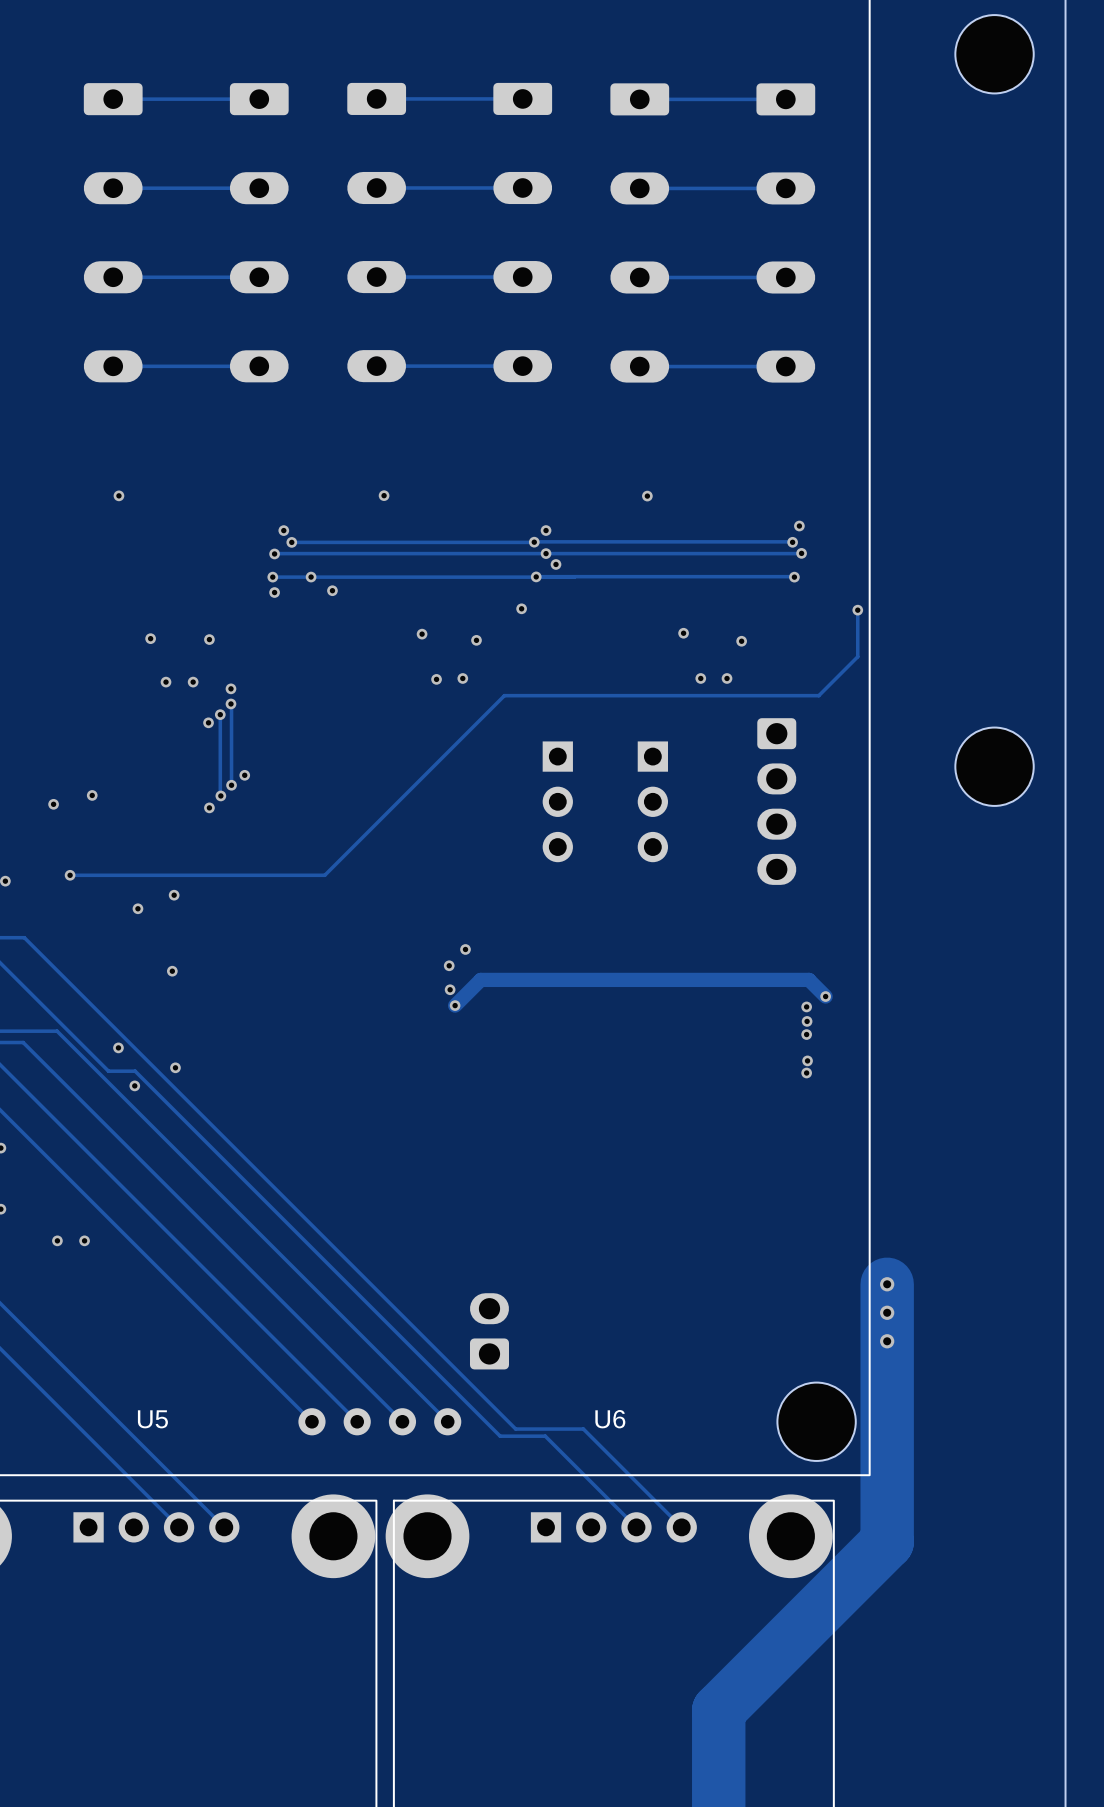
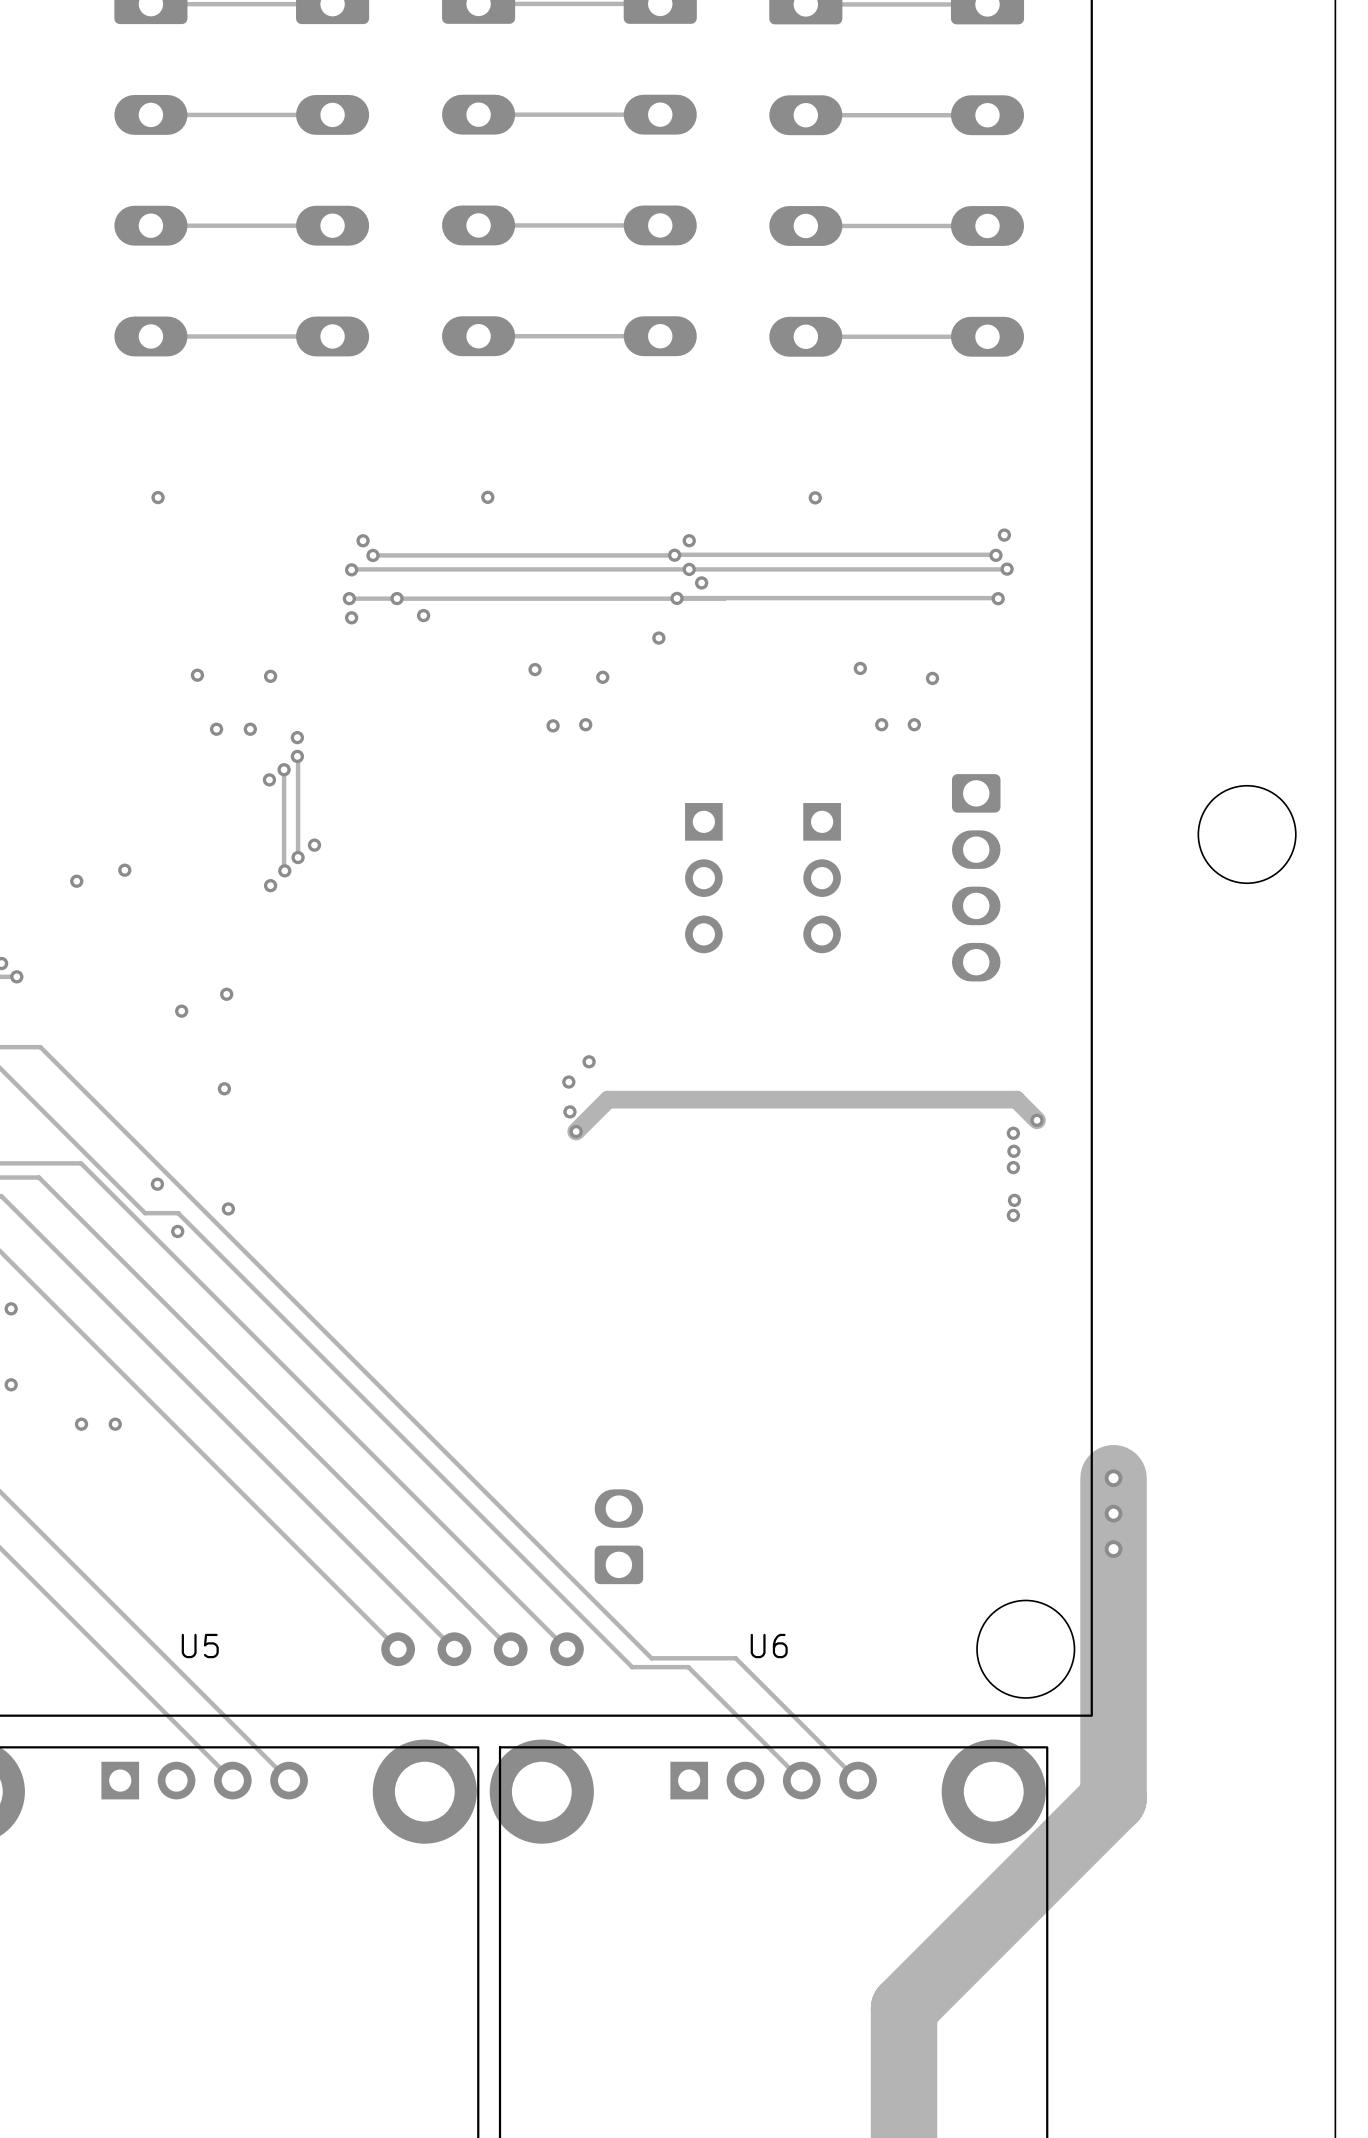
track: (857, 610) (857, 656) (818, 695) (504, 695) (324, 875) (70, 875) -> none
via: (857, 610) -> none
via: (70, 875) -> none

